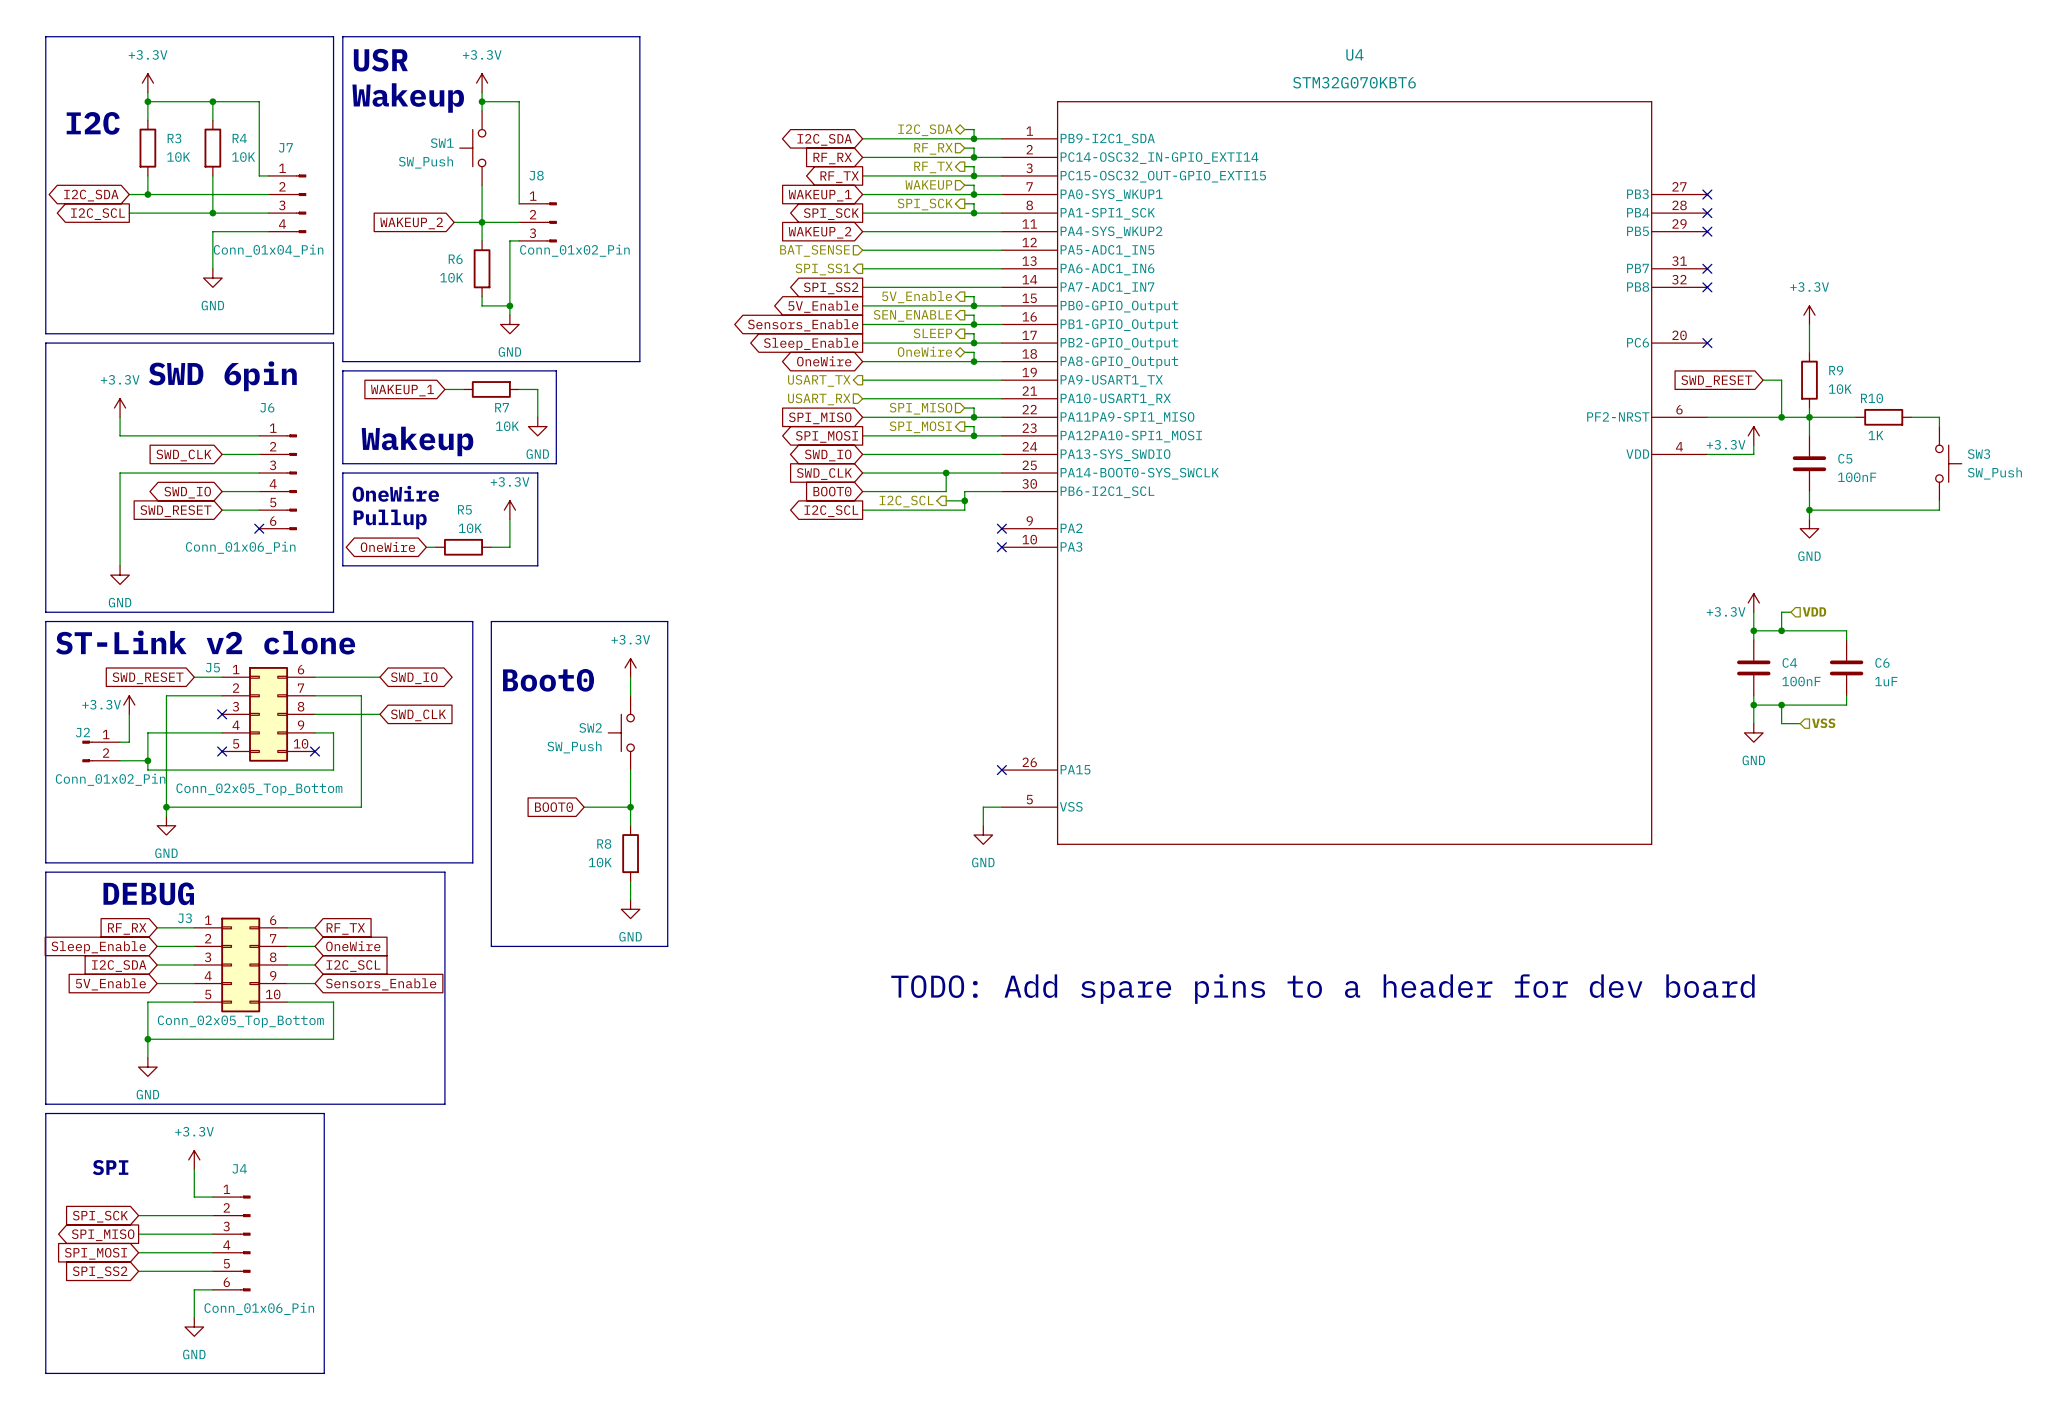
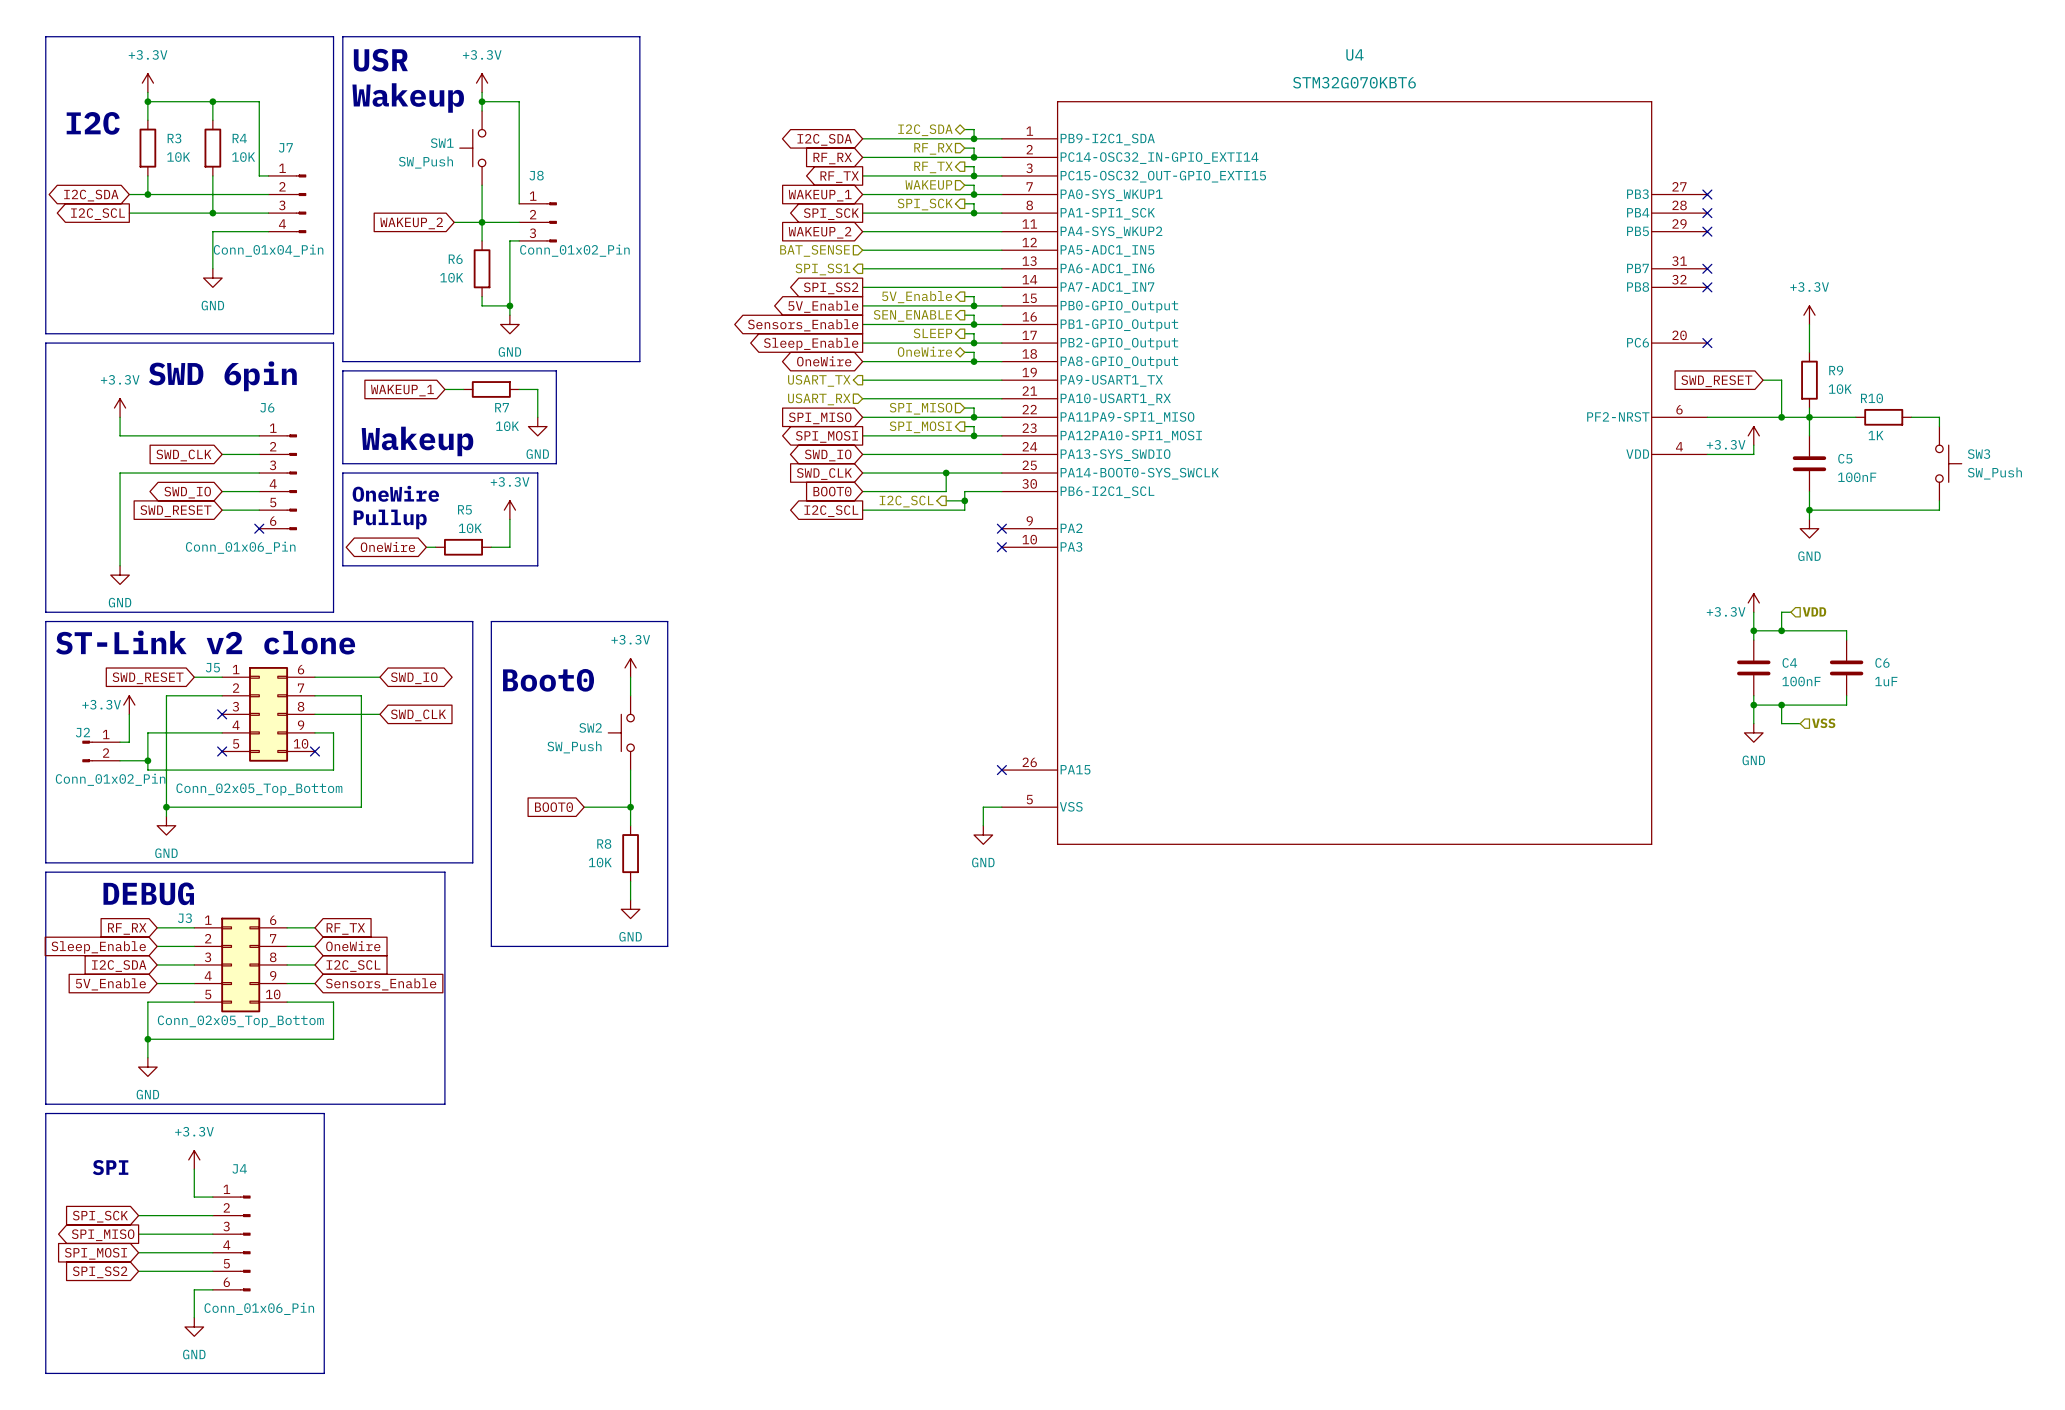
text: TODO: Add spare pins to a header for dev board (1322, 988) -> none

